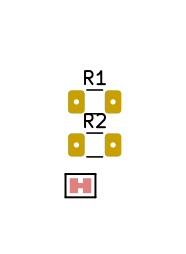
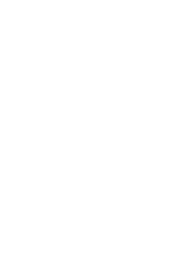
R1: (94, 101) -> none
R2: (94, 144) -> none
part: (80, 185) -> none

